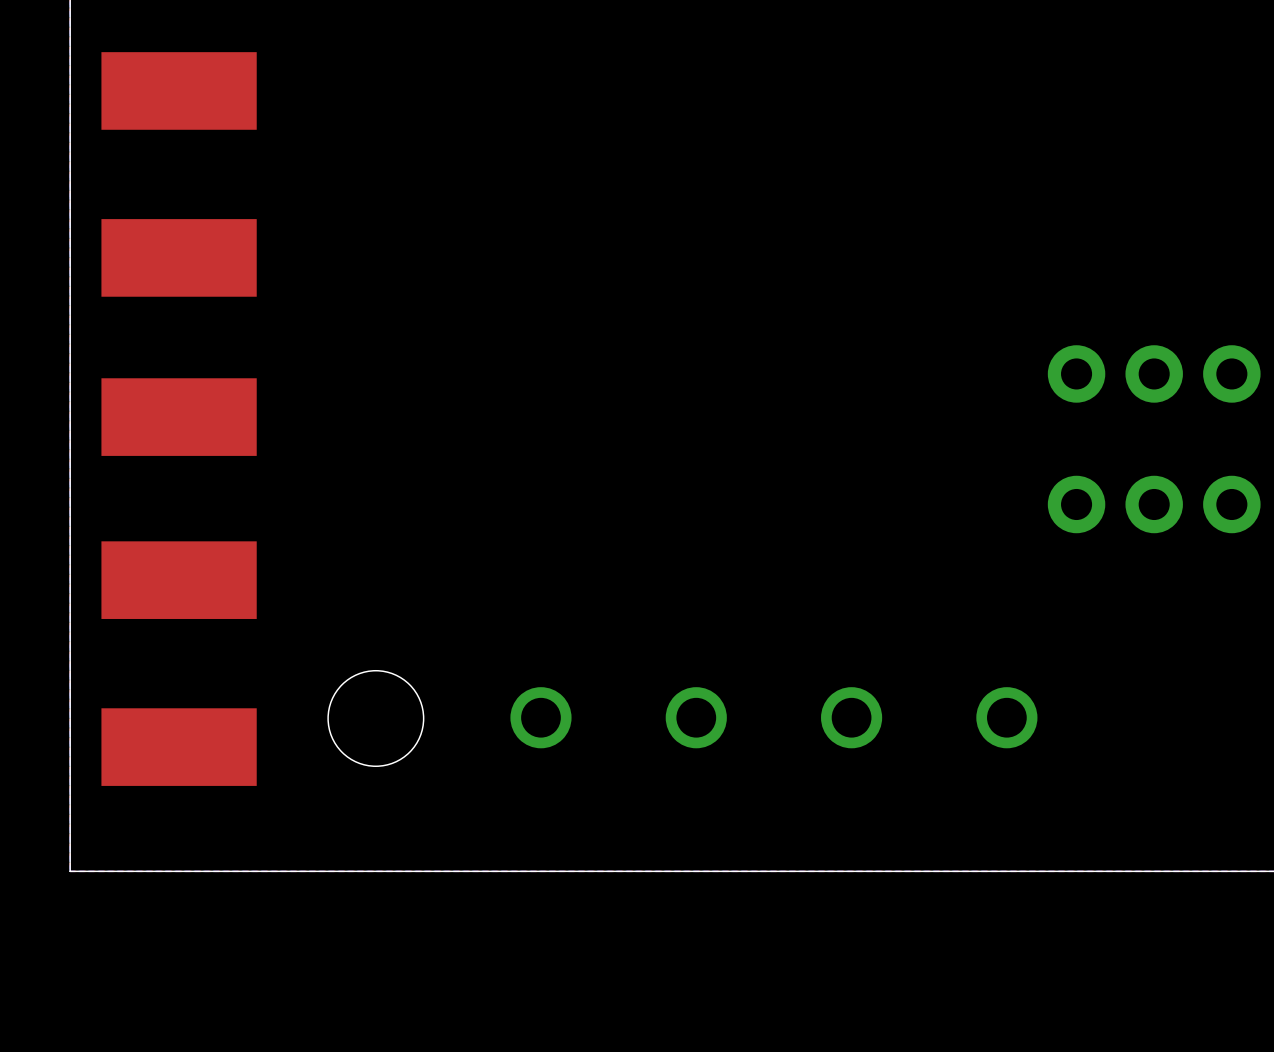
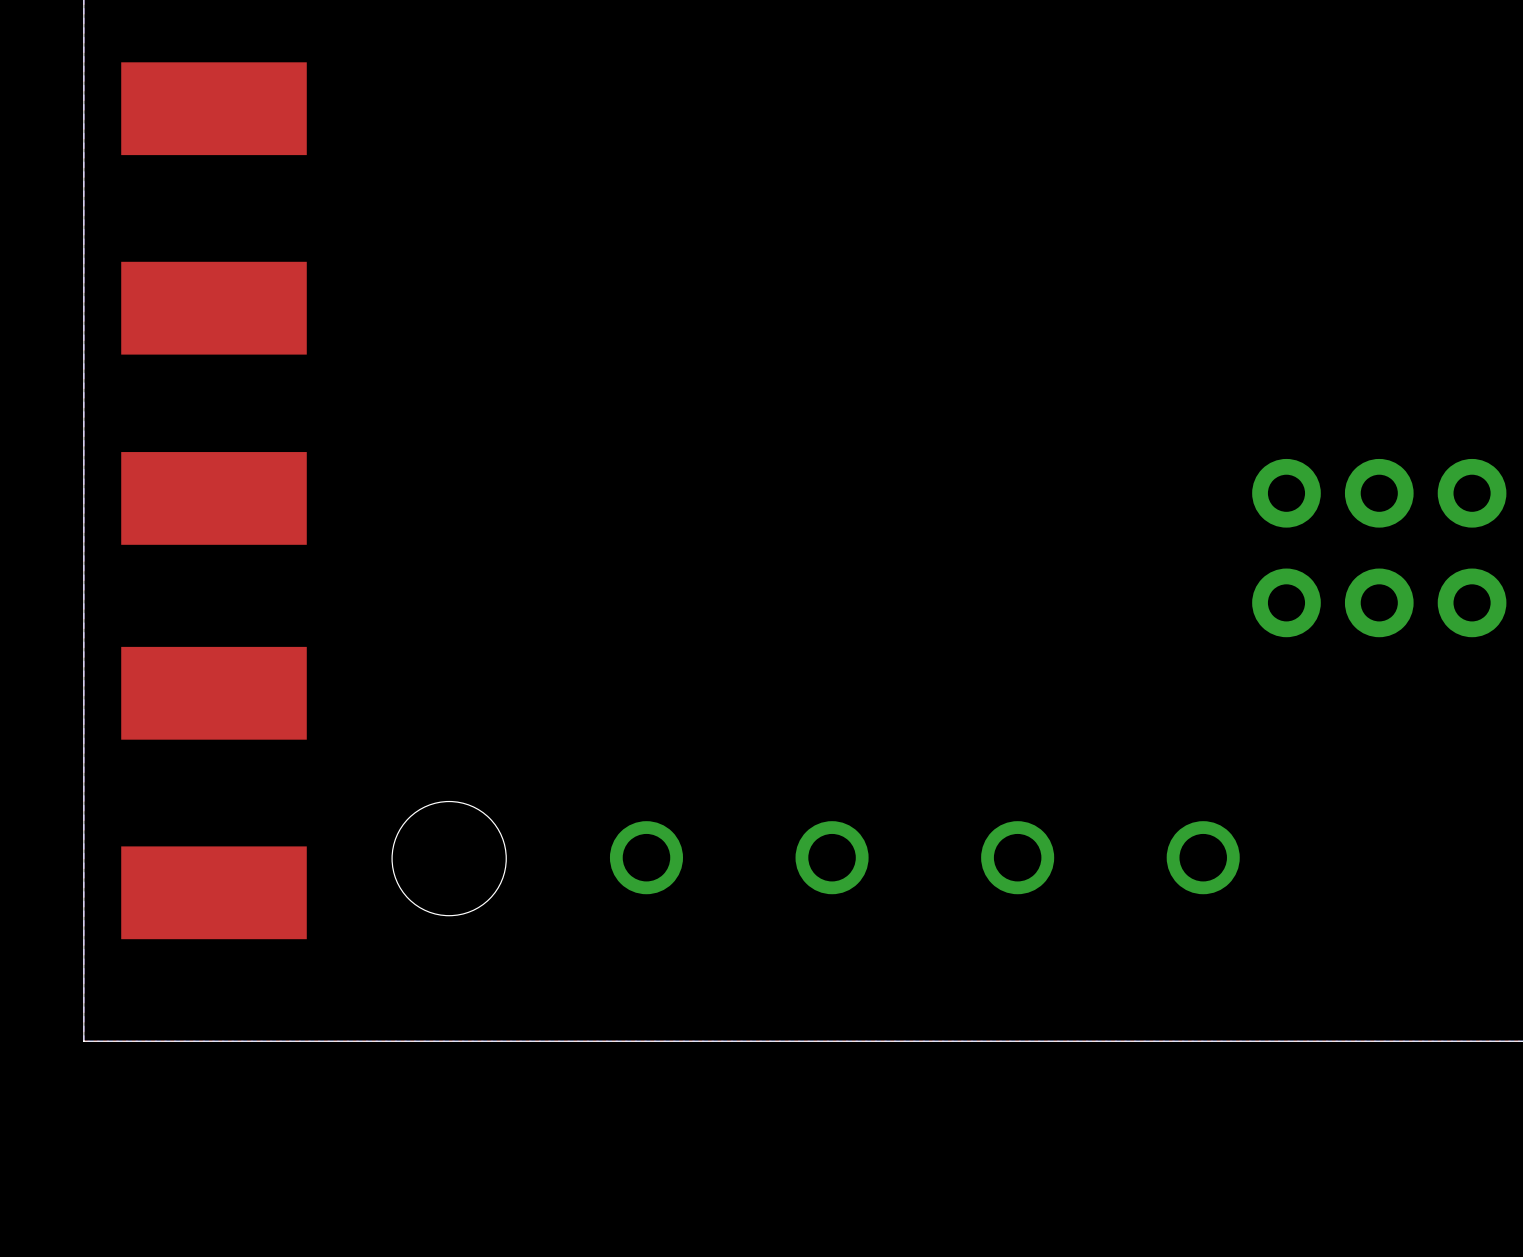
part position: (1154, 373) -> (1379, 493)

